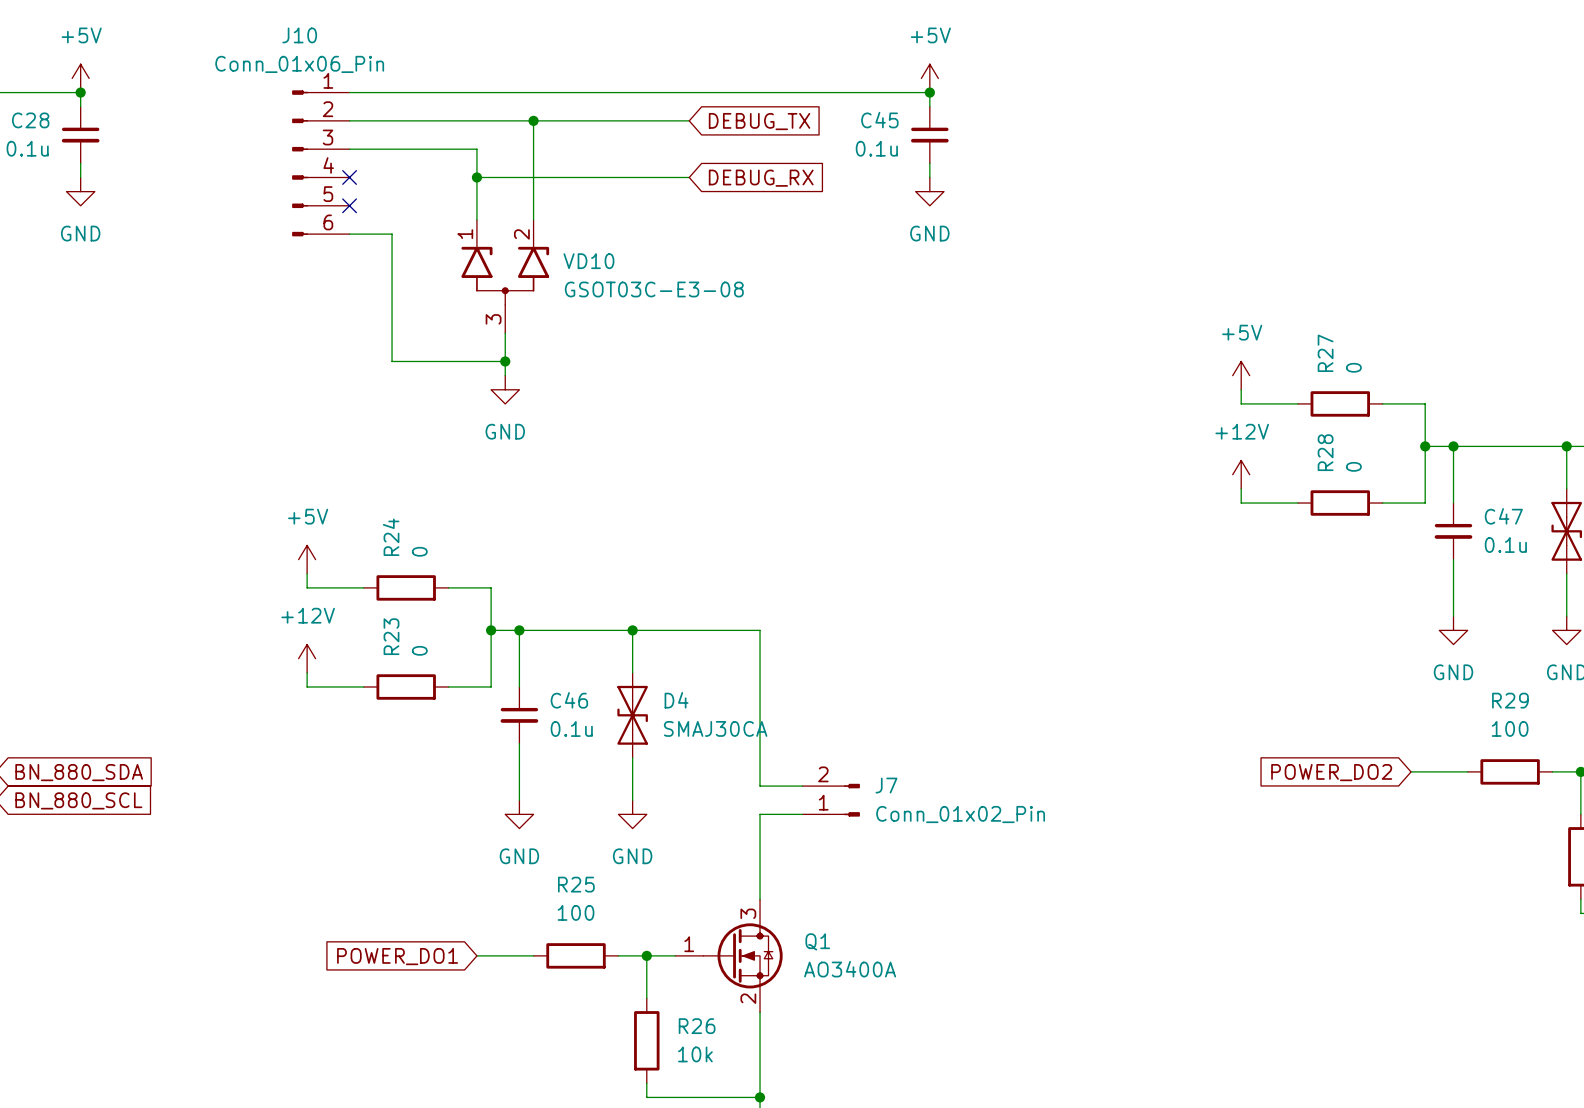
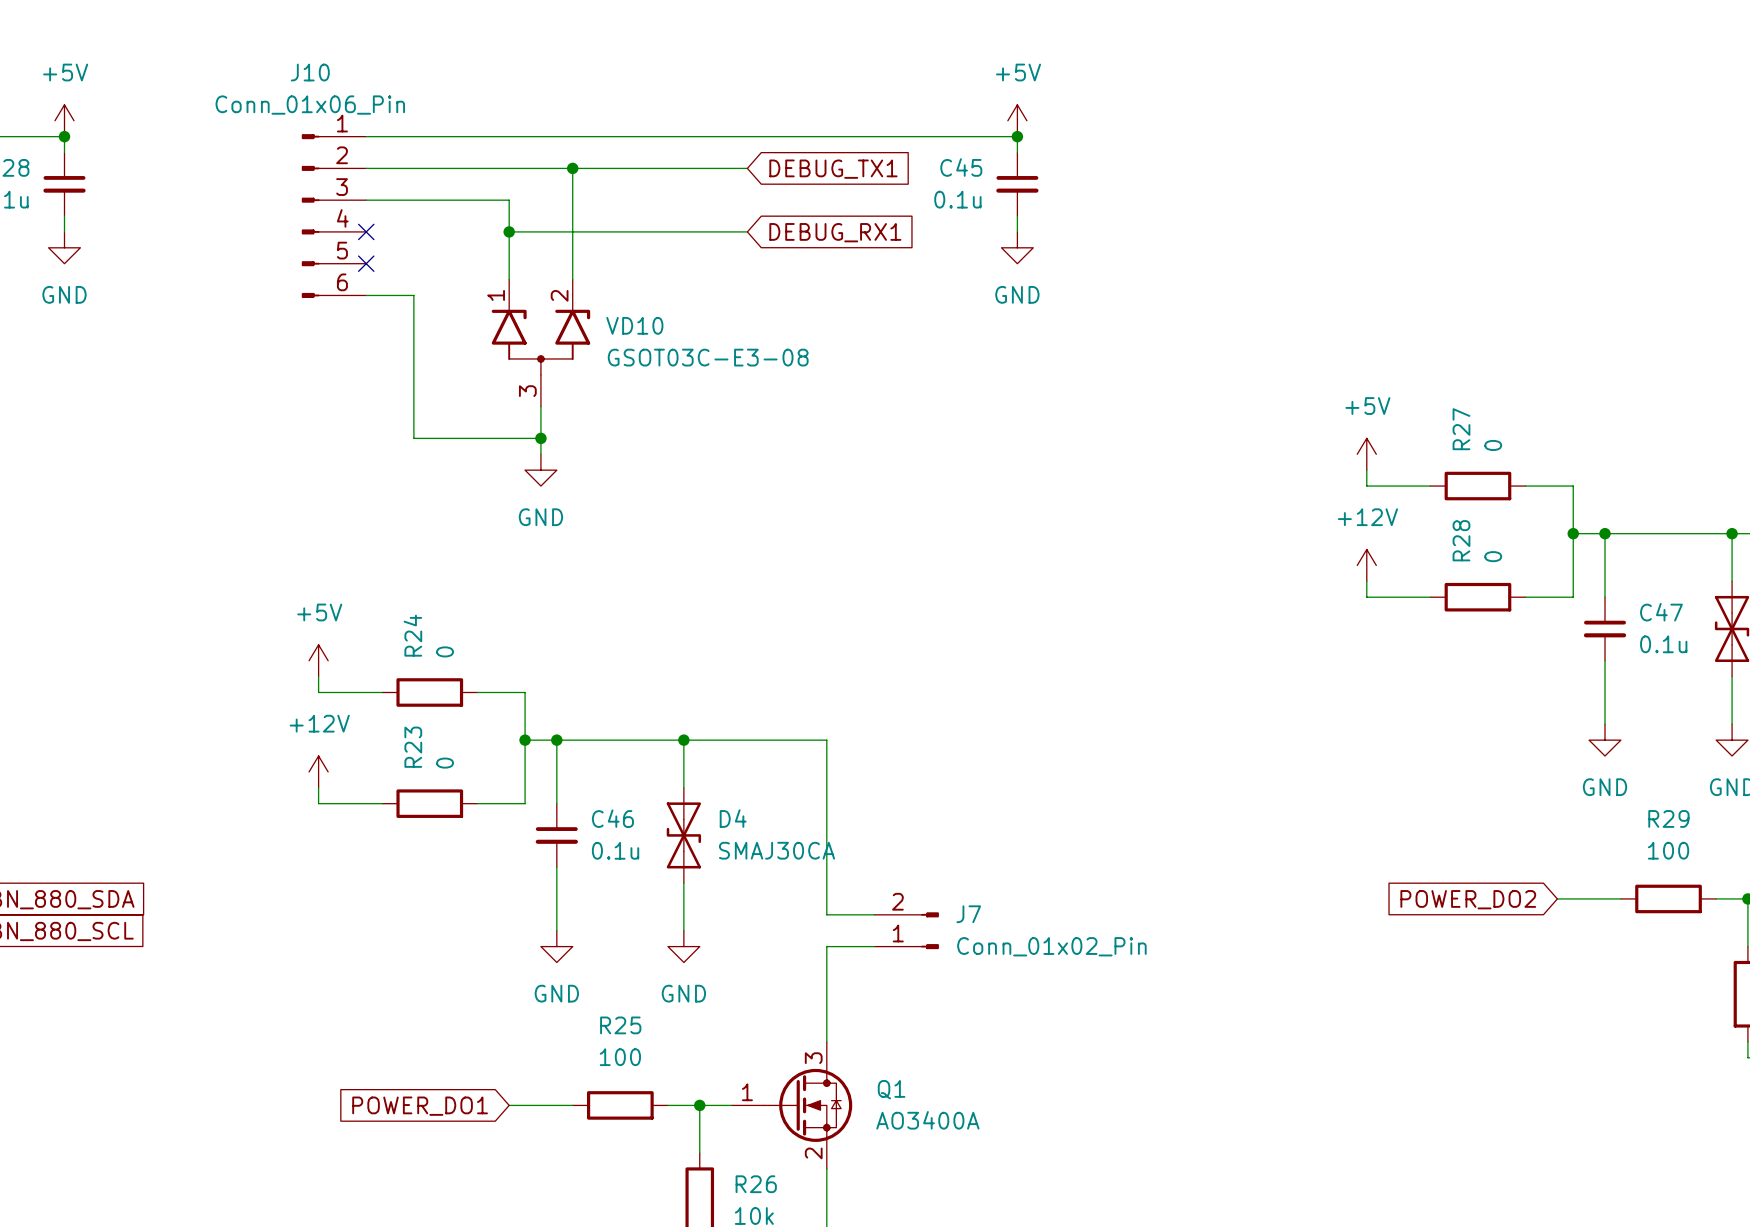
global label: DEBUG_TX (759, 121) -> DEBUG_TX1 (833, 169)
global label: DEBUG_RX (761, 178) -> DEBUG_RX1 (835, 232)

